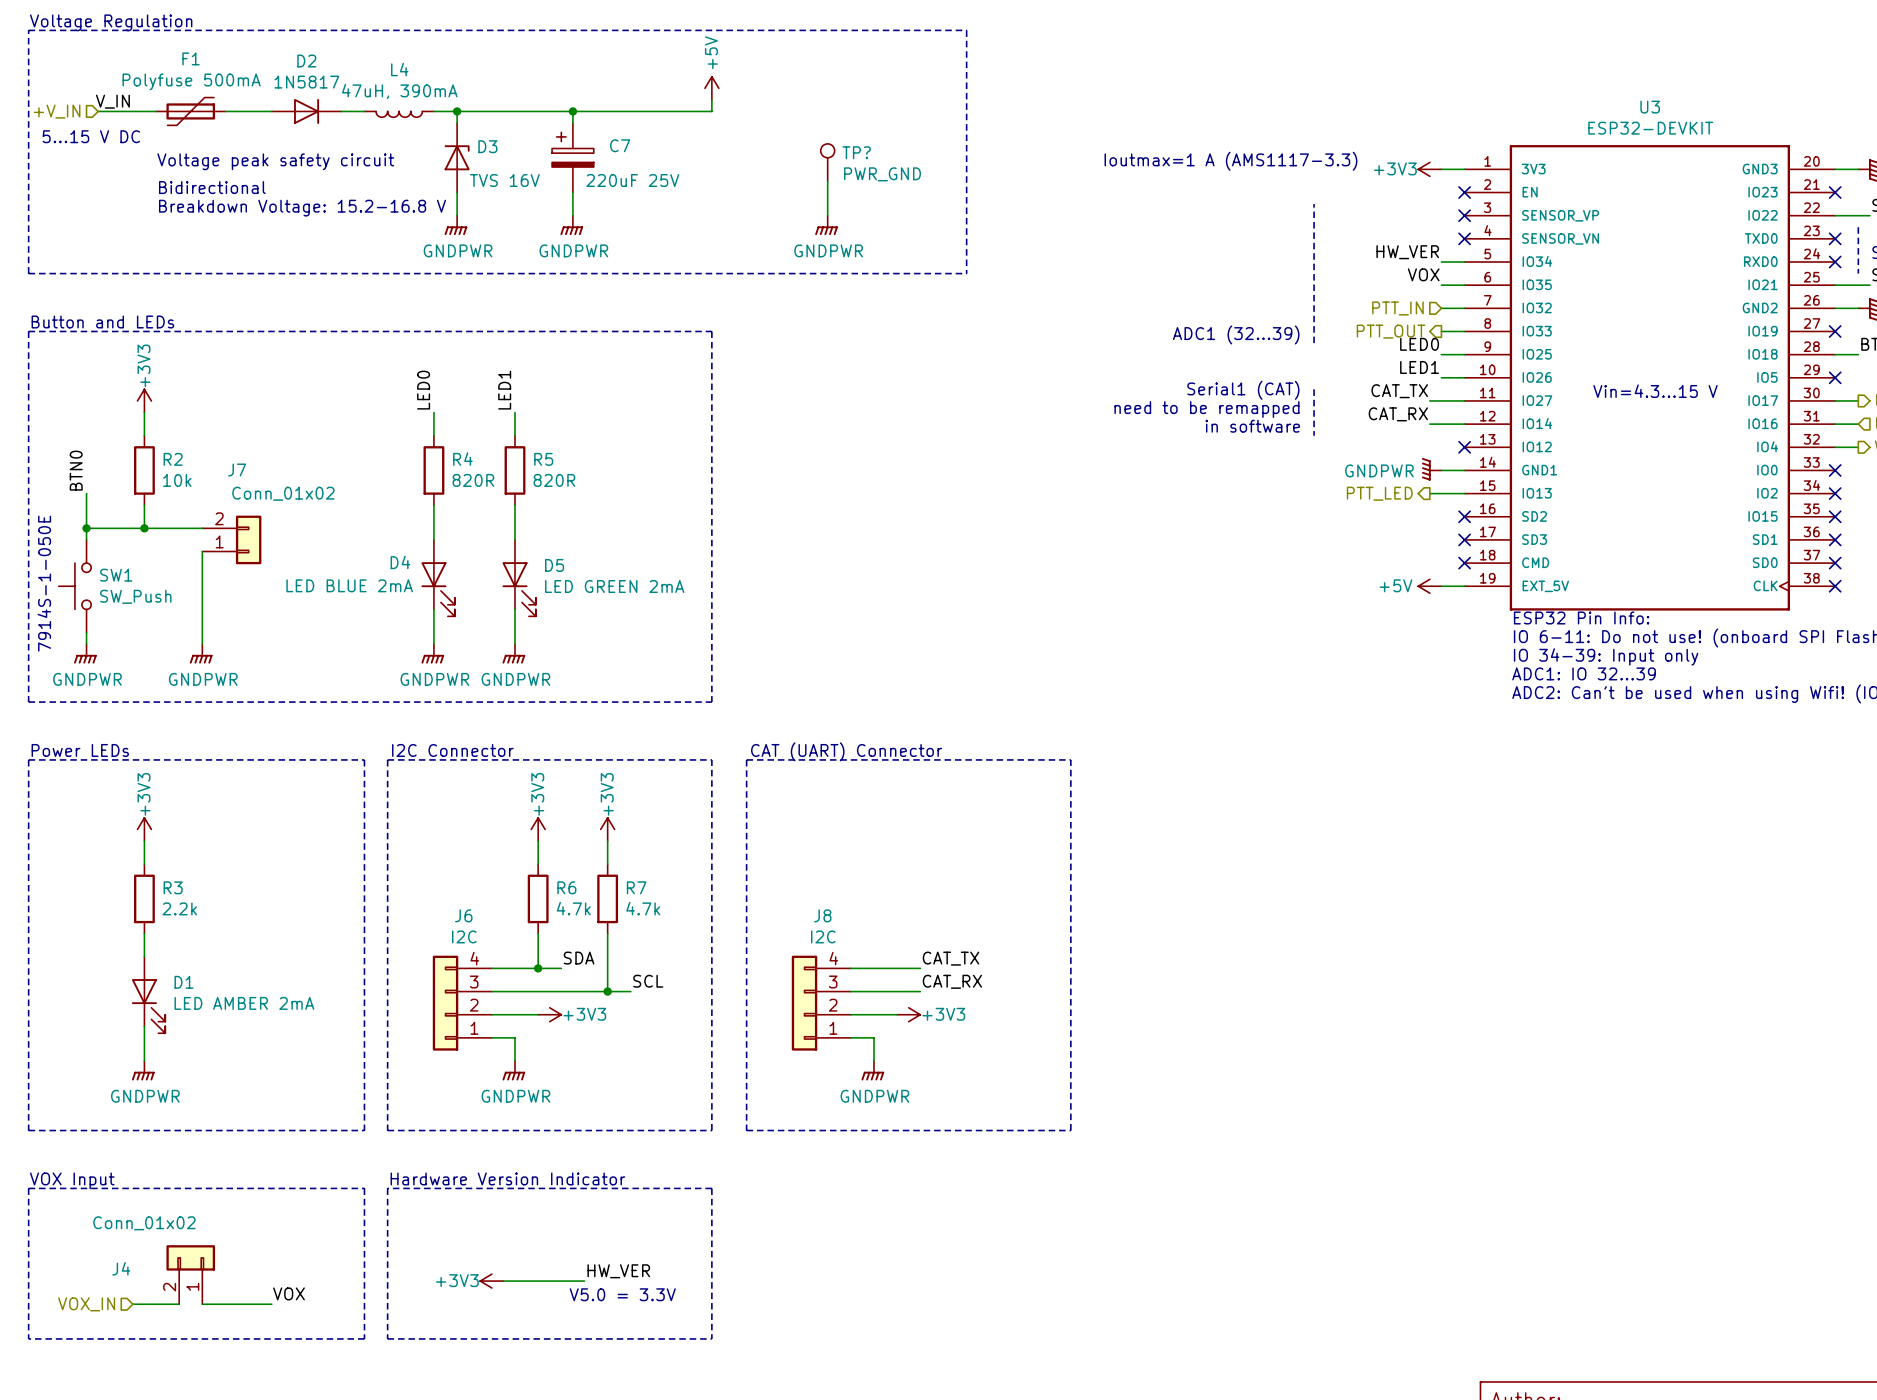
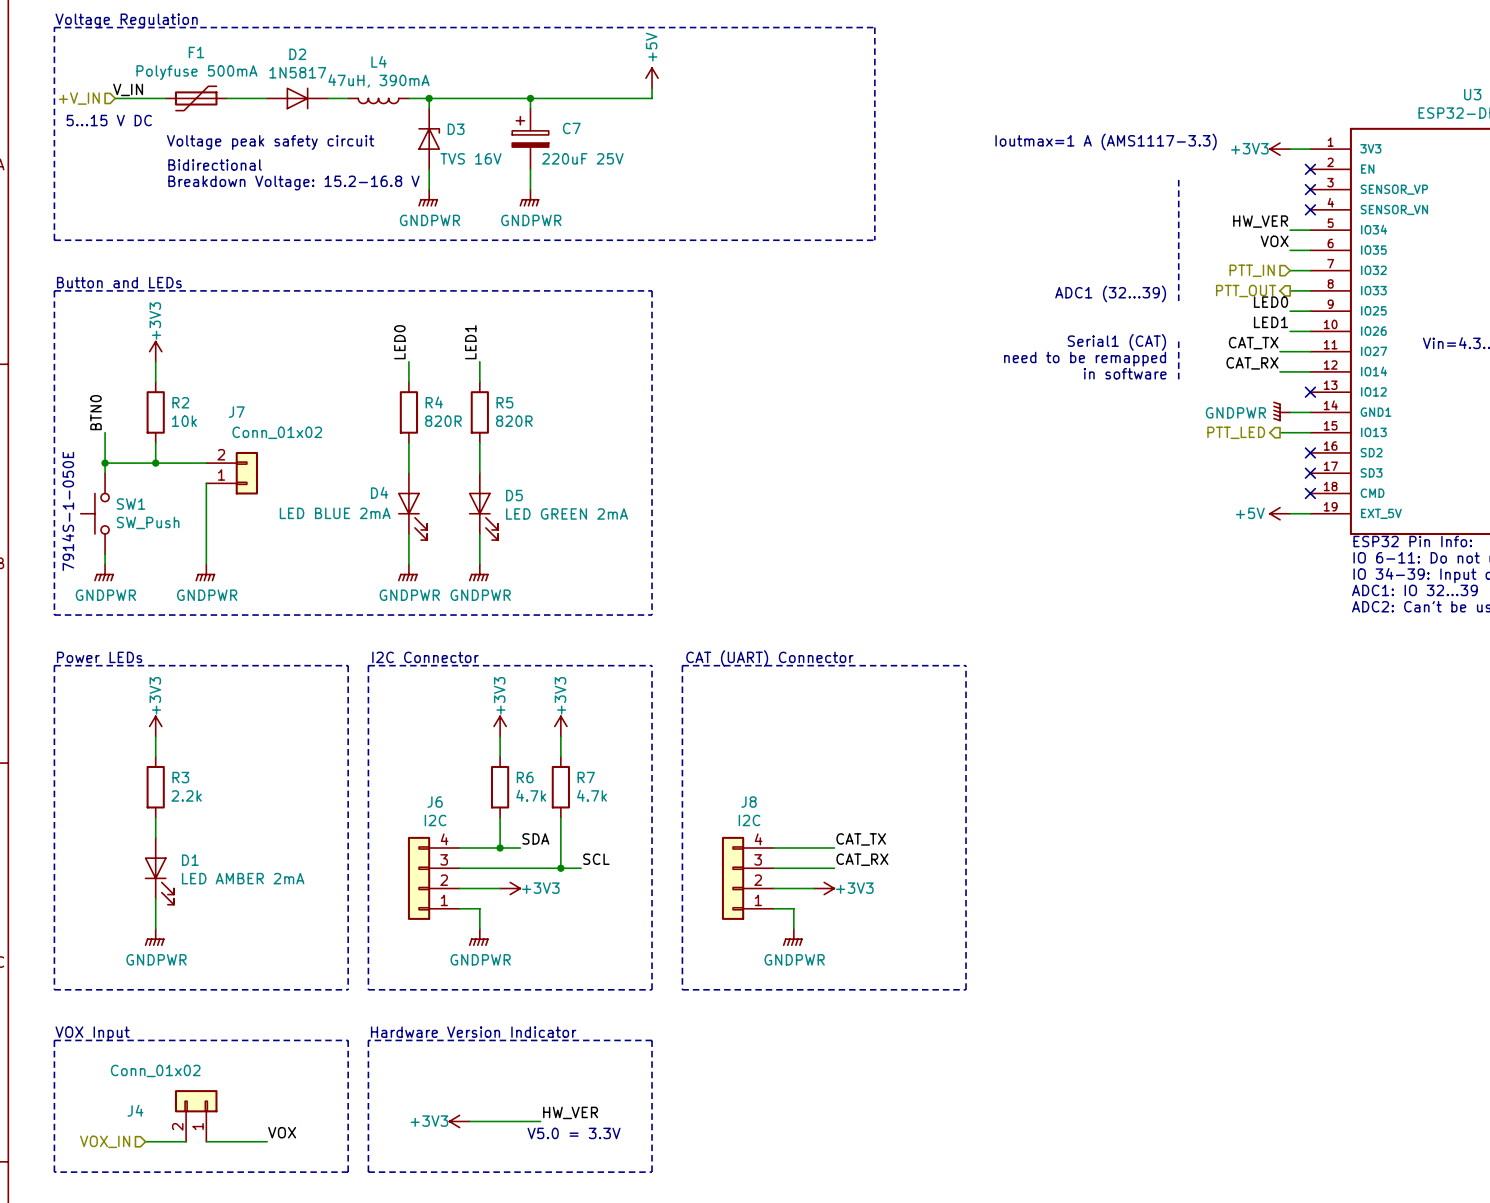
TP?: PWR_GND (827, 162) -> none
wire: (827, 180) (827, 215) -> none
power symbol: GNDPWR (826, 225) -> none

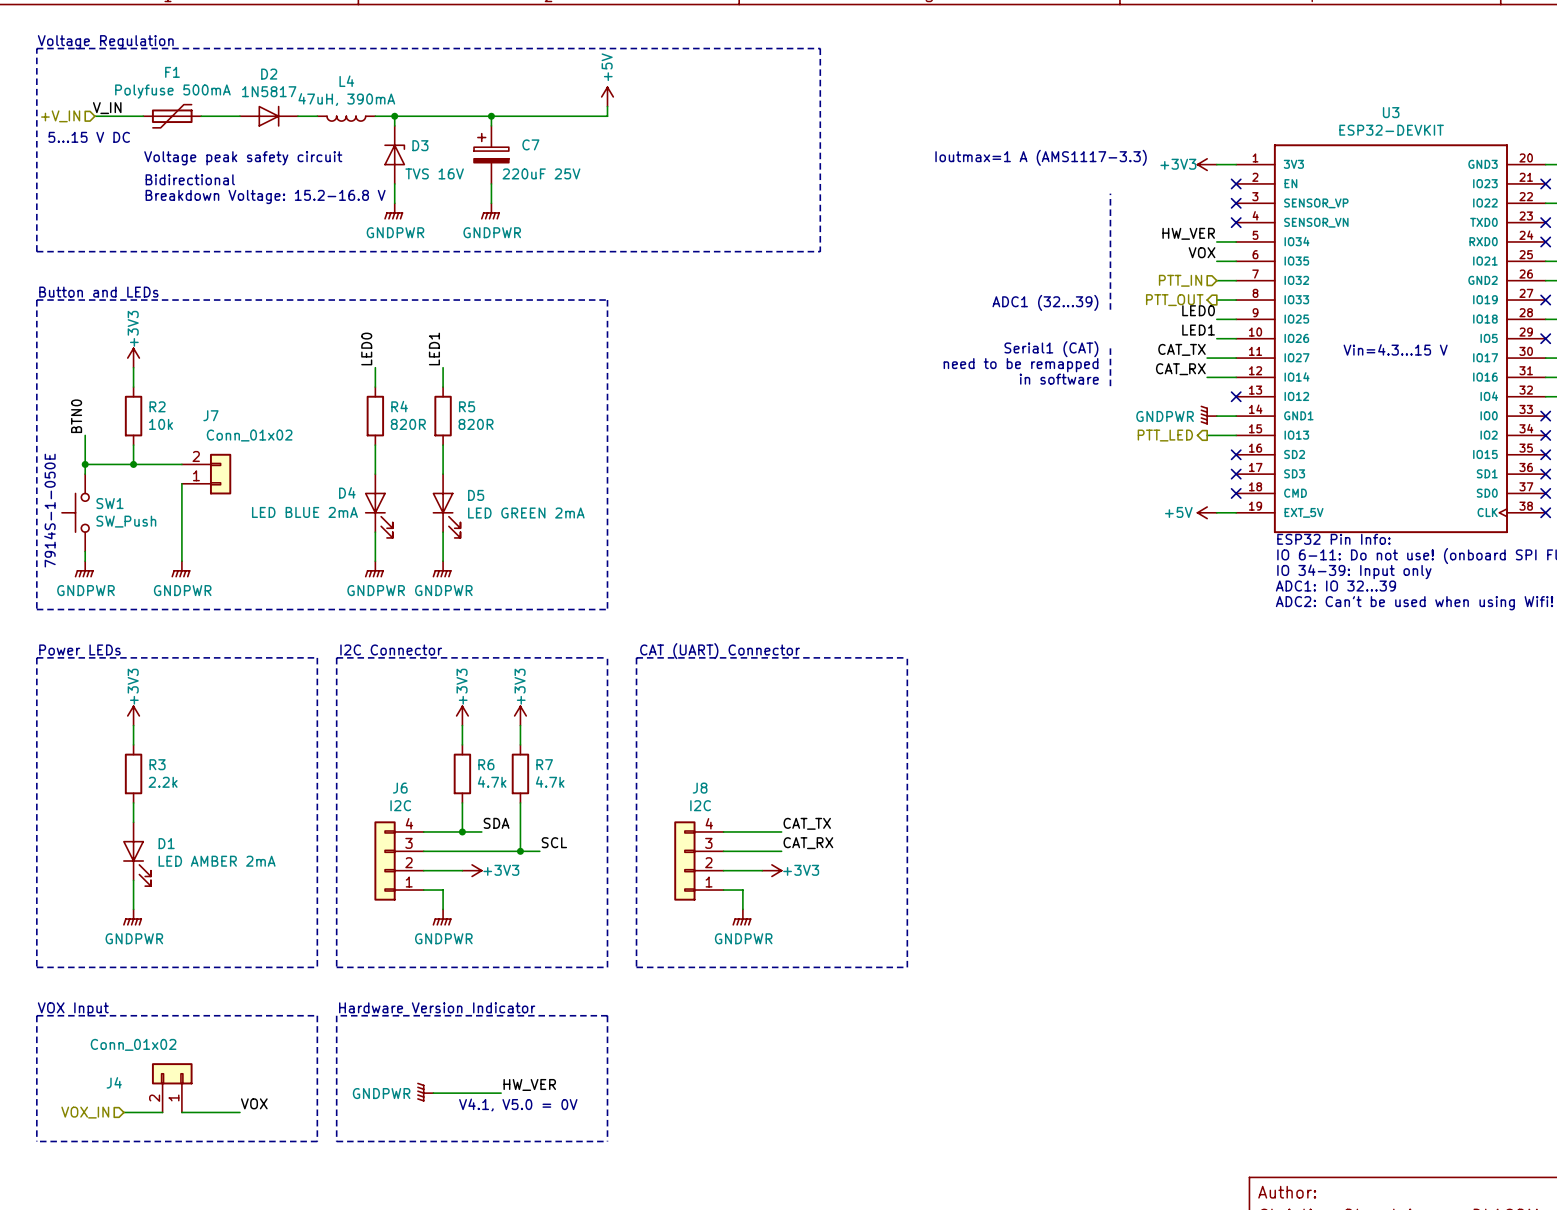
power symbol: +3V3 (459, 1121) -> GNDPWR (425, 1092)
text: V5.0 = 3.3V (574, 1133) -> V4.1, V5.0 = 0V (518, 1105)

